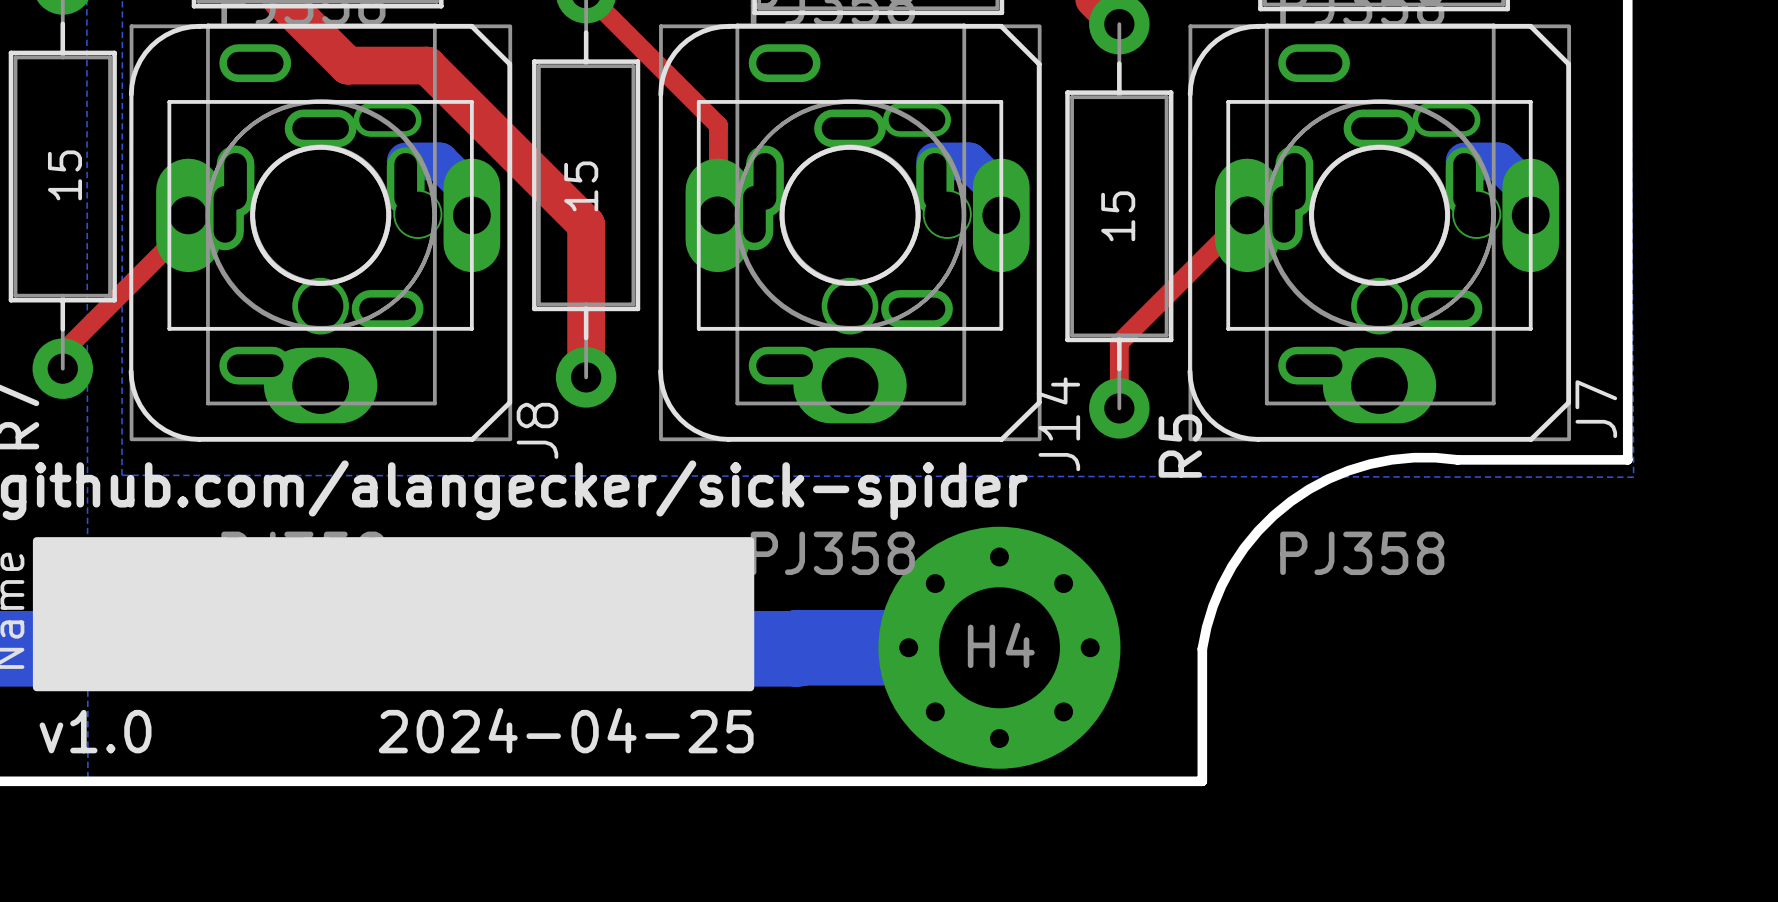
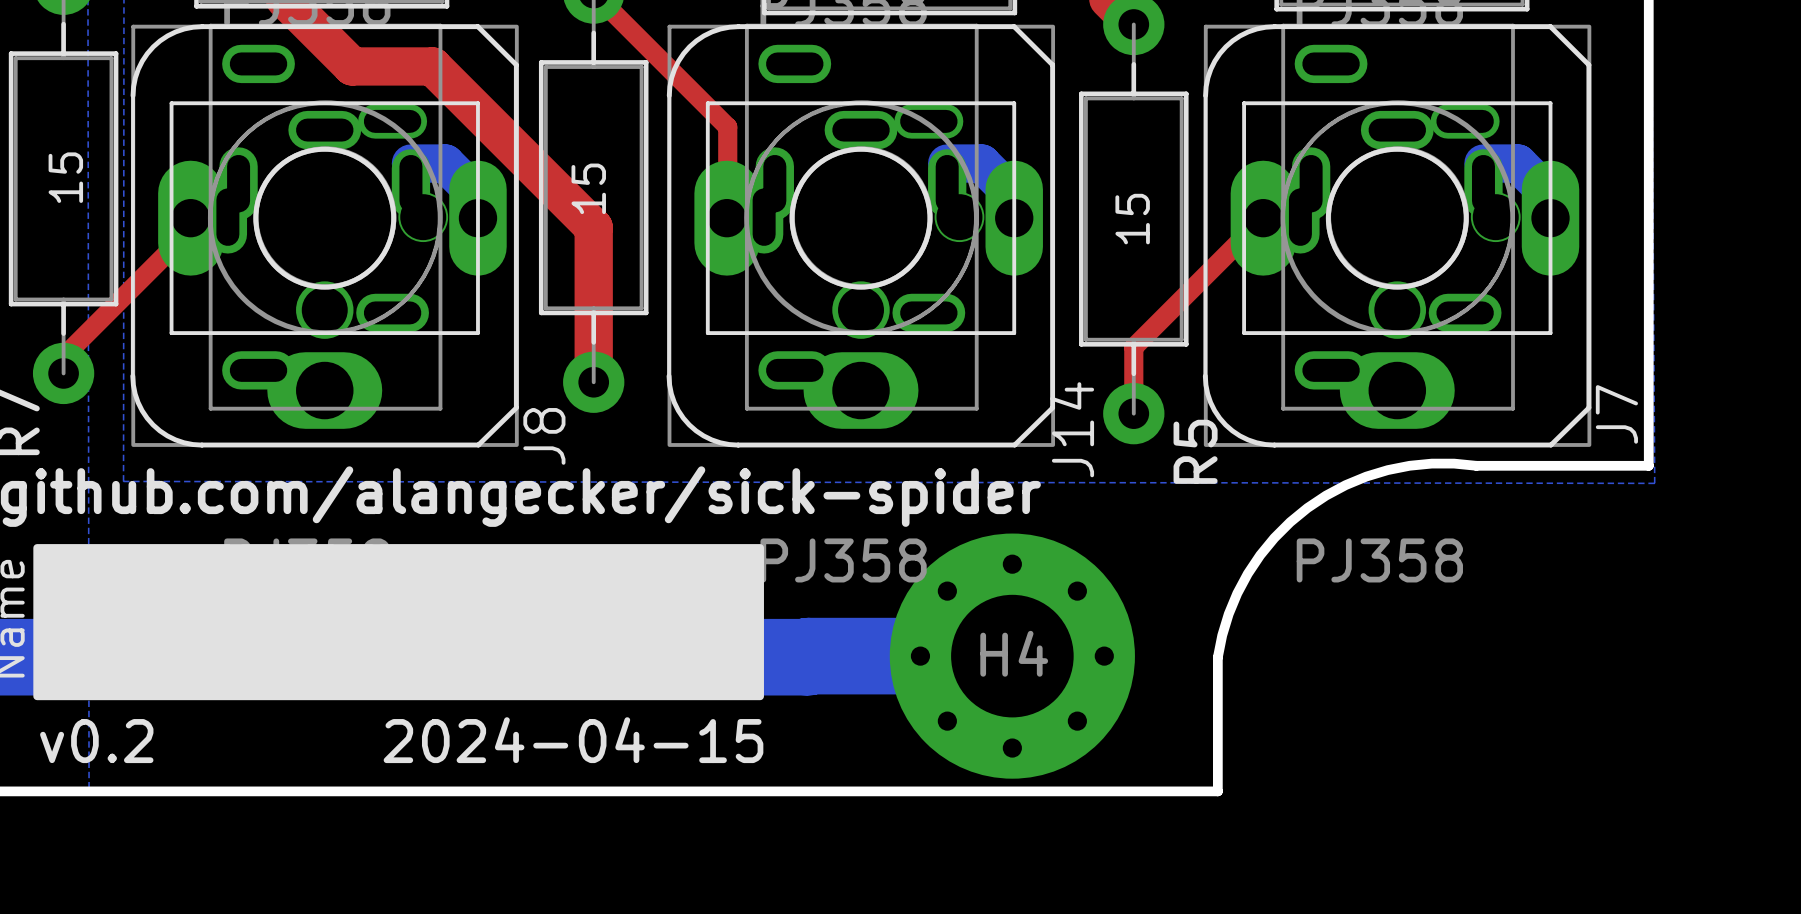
text: 2024-04-25 (566, 730) -> 2024-04-15 (573, 740)
text: v1.0 (95, 731) -> v0.2 (96, 741)

